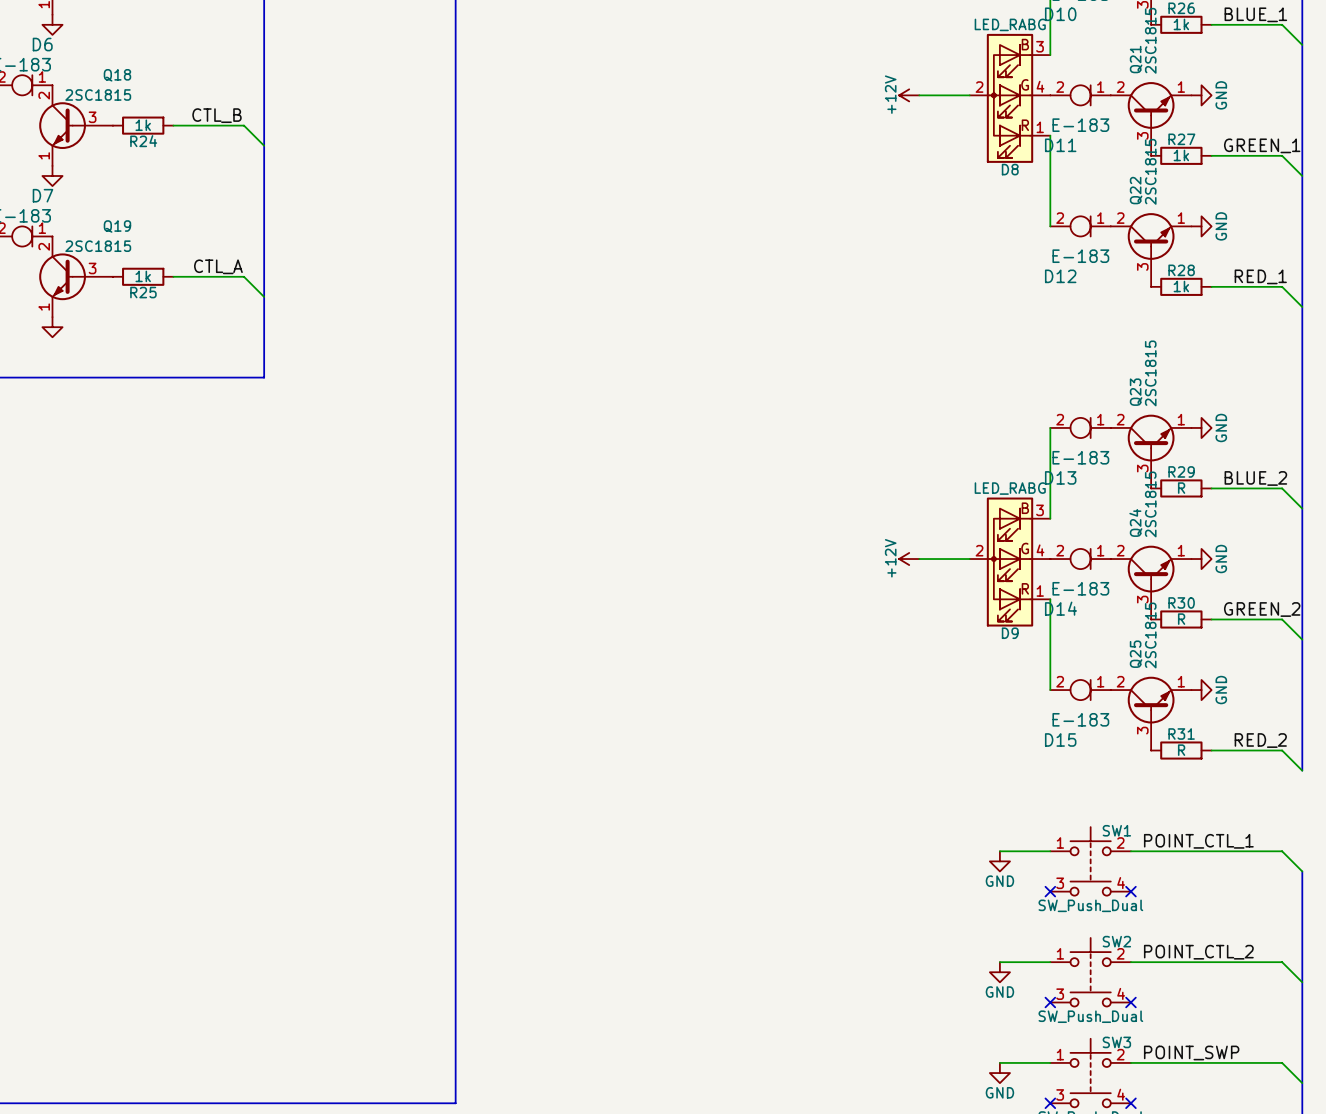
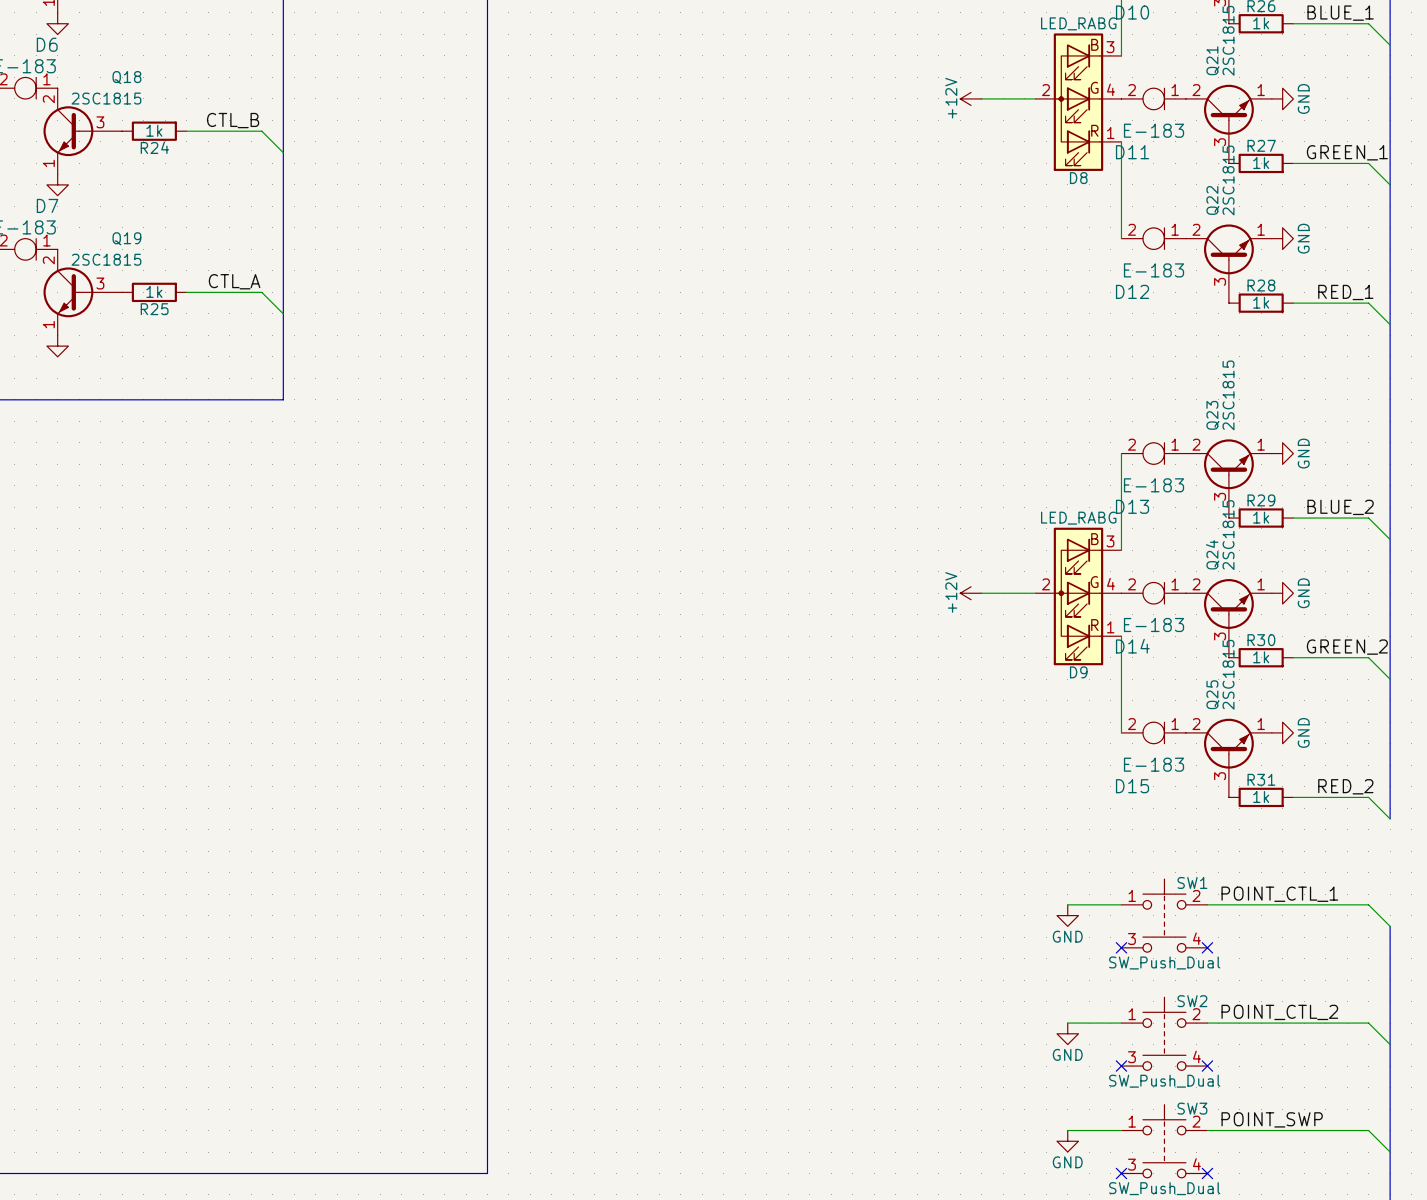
R29 value: R (1181, 488) -> 1k (1261, 517)
R30 value: R (1181, 619) -> 1k (1261, 657)
R31 value: R (1181, 750) -> 1k (1261, 797)

